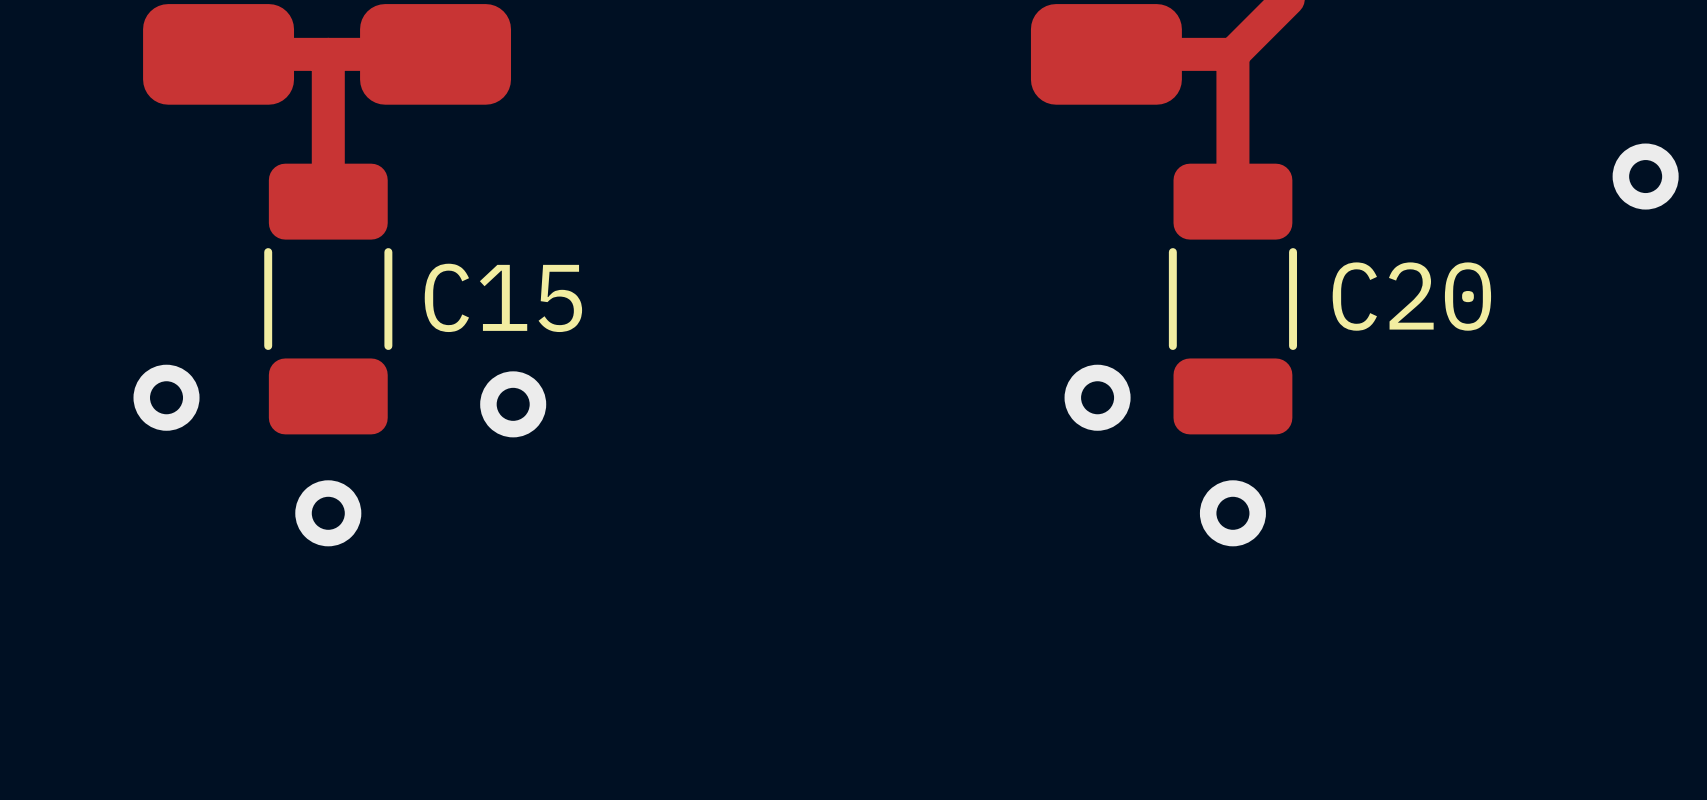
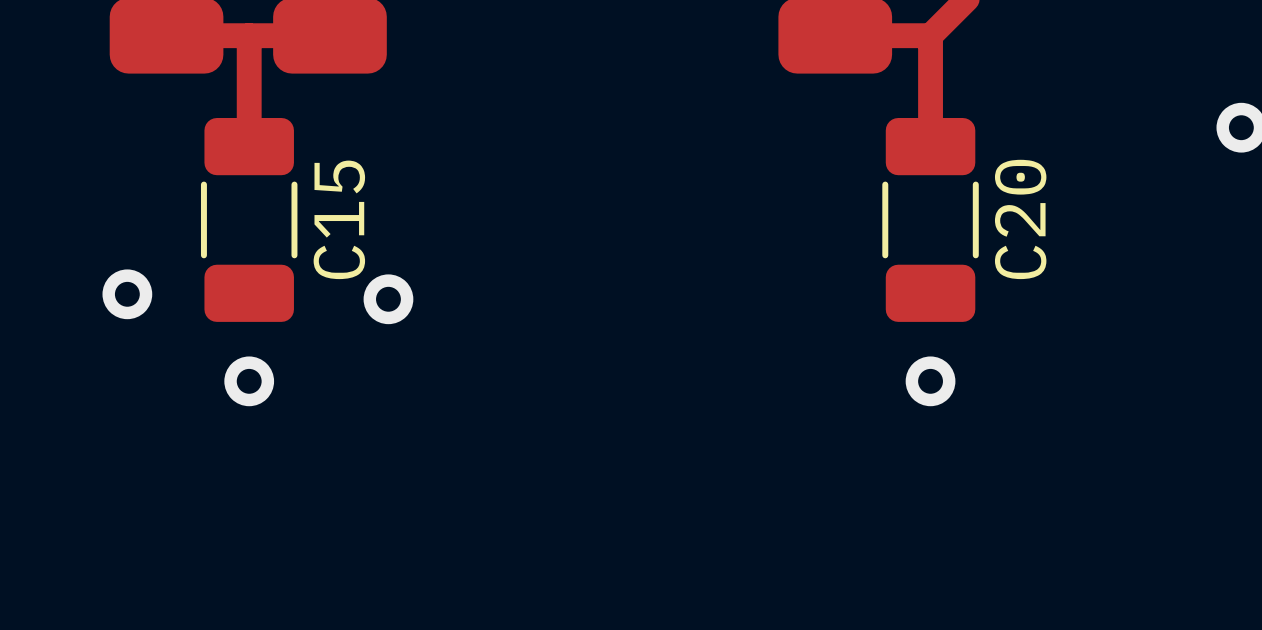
C20 name rotation: 0° (1411, 296) -> 90° counterclockwise (1020, 219)
C15 name rotation: 0° (503, 297) -> 90° counterclockwise (339, 219)
via: (1097, 397) -> none

